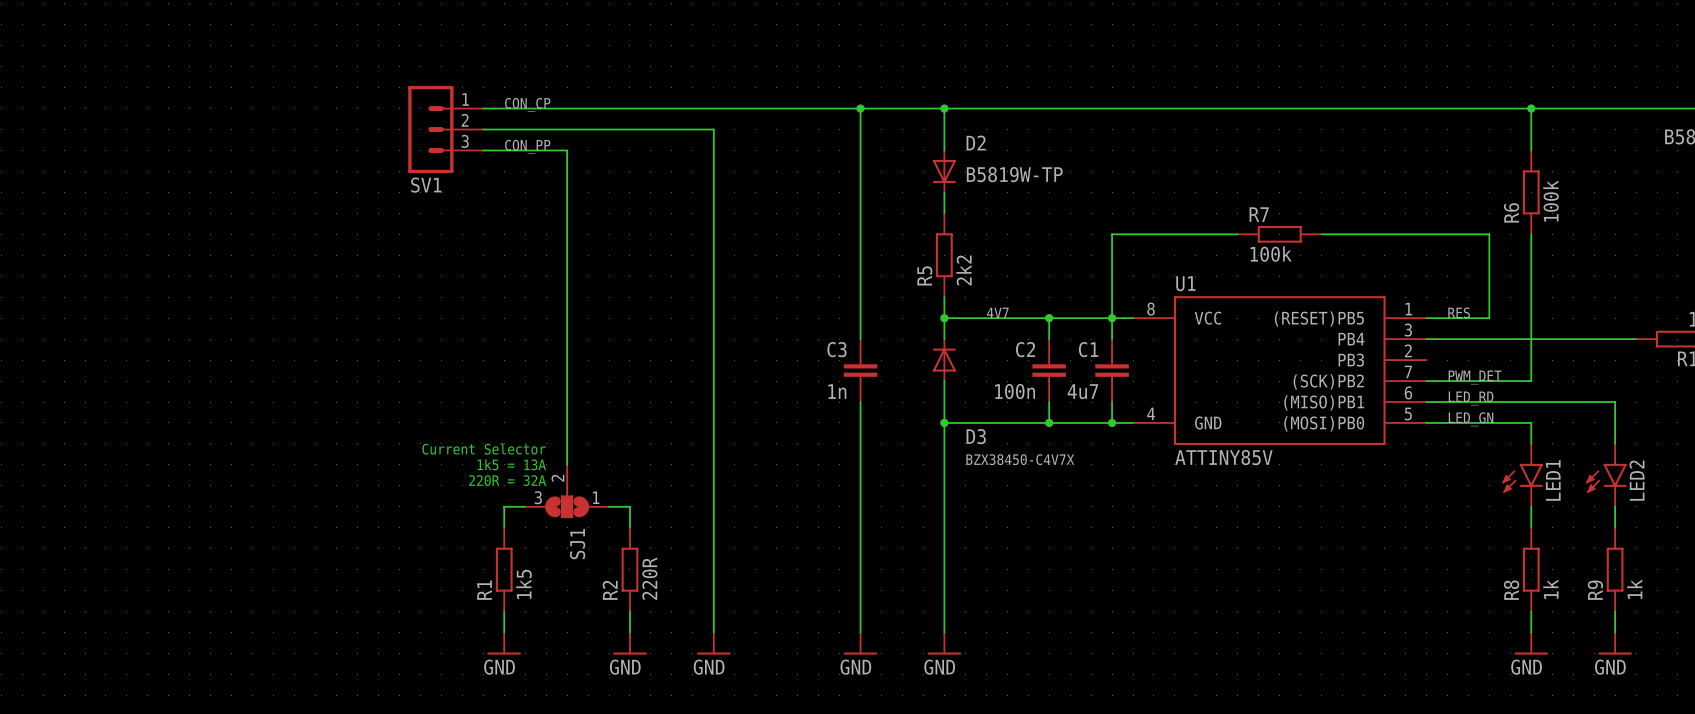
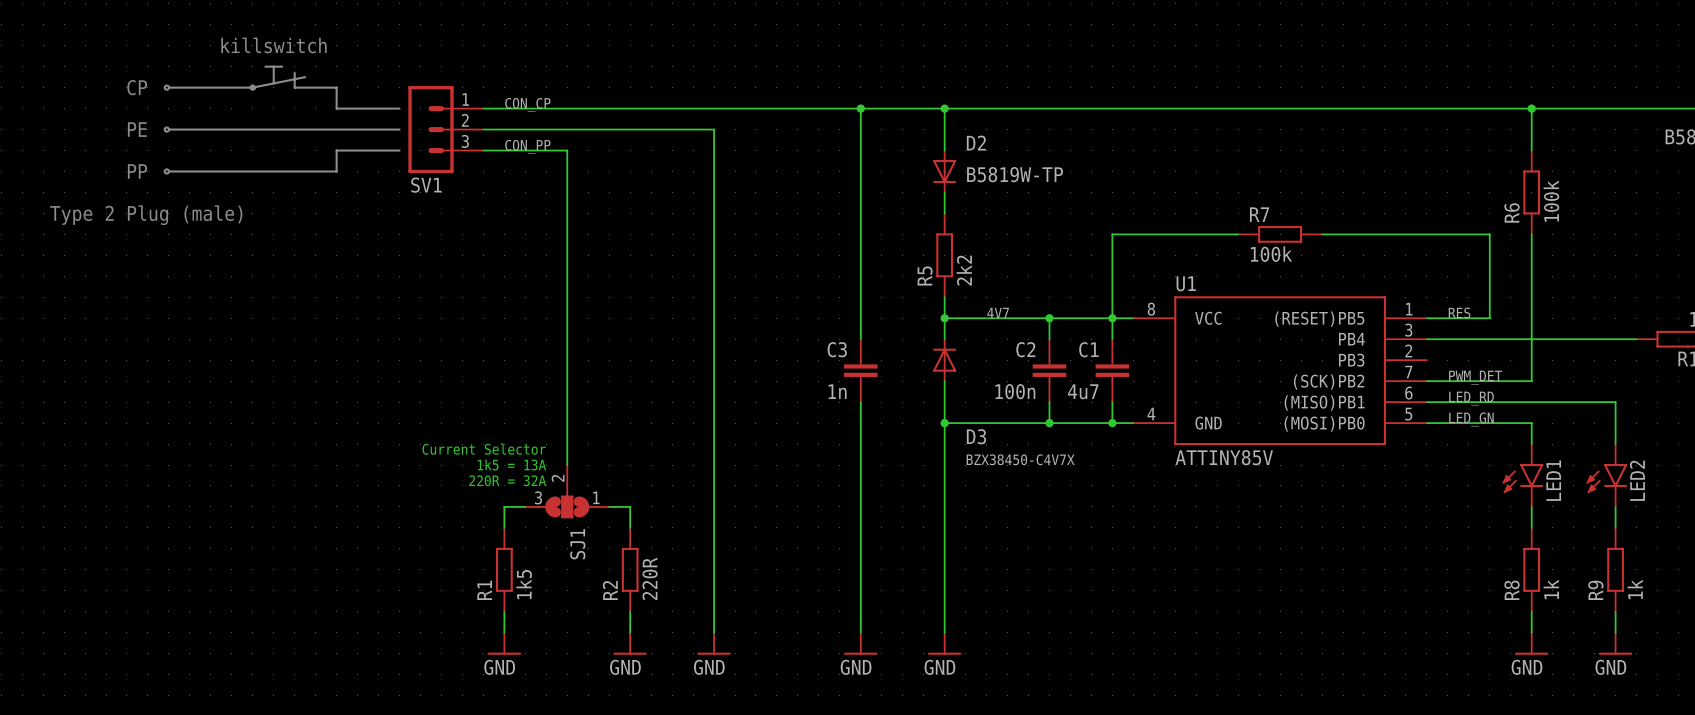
text: none -> killswitch (273, 45)
line: none -> (265, 66) (282, 66)
line: none -> (273, 66) (273, 83)
line: none -> (294, 72) (294, 87) (336, 87) (336, 108) (399, 108)
line: none -> (305, 77) (252, 87) (168, 87)
drawing: none -> [163, 84, 170, 91]
drawing: none -> [249, 84, 256, 91]
text: none -> CP (137, 87)
drawing: none -> [163, 126, 170, 133]
text: none -> PE (137, 129)
line: none -> (168, 129) (399, 129)
line: none -> (399, 150) (336, 150) (336, 171) (168, 171)
drawing: none -> [163, 168, 170, 175]
text: none -> PP (137, 171)
text: none -> Type 2 Plug (male) (146, 215)

